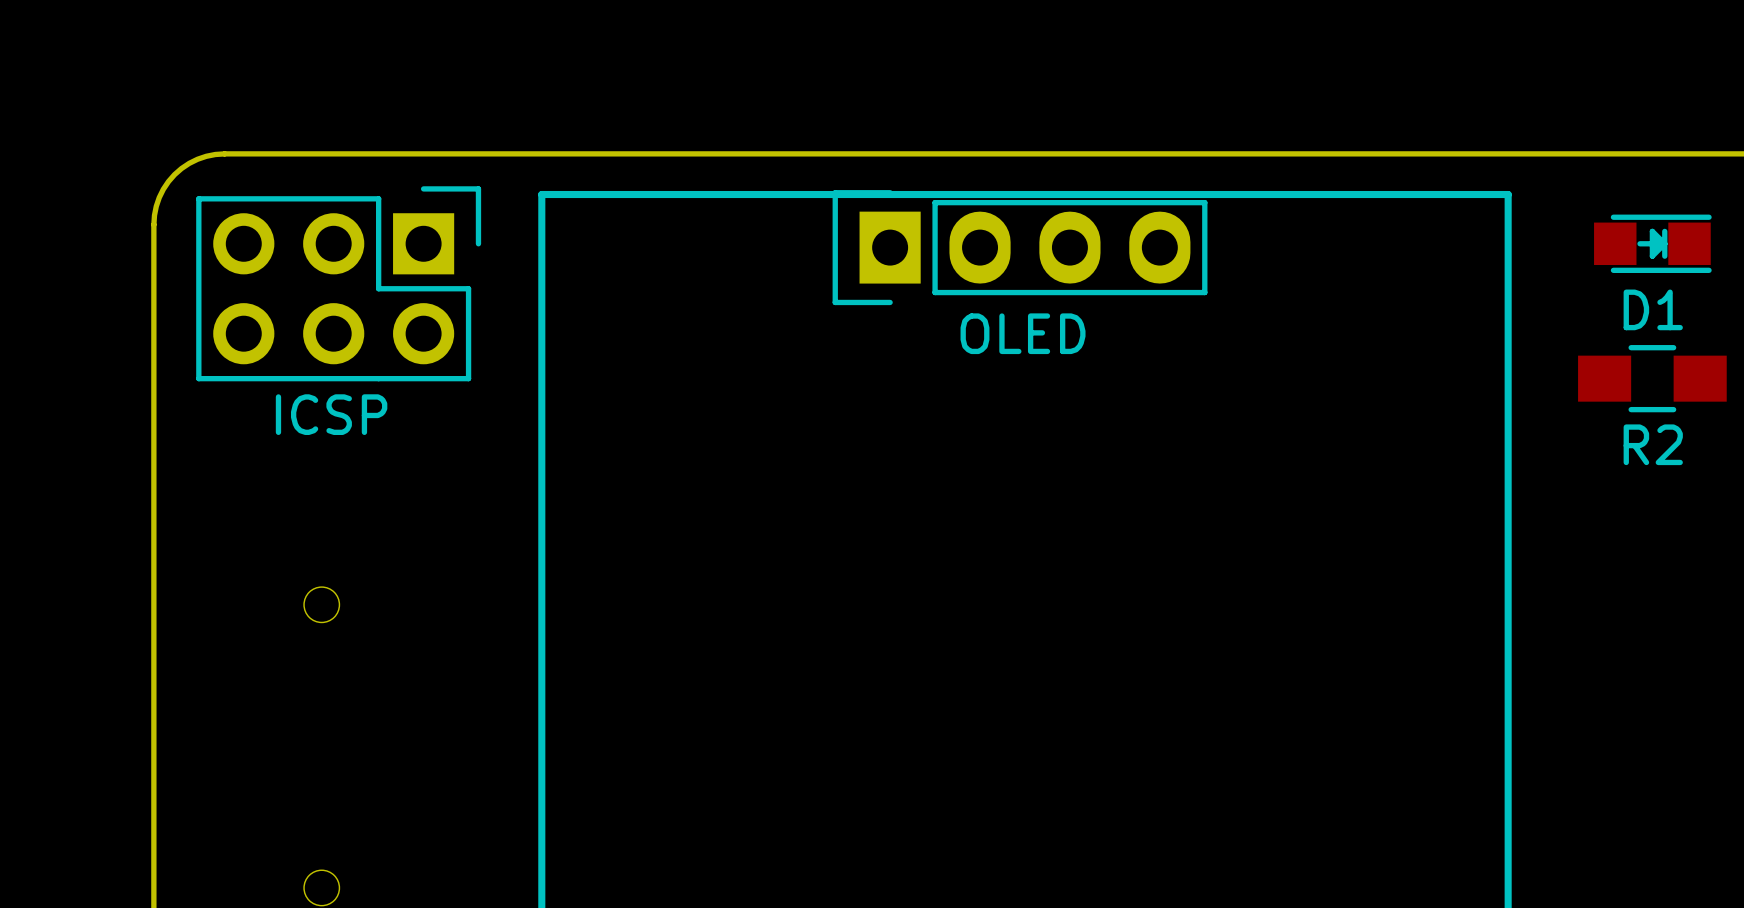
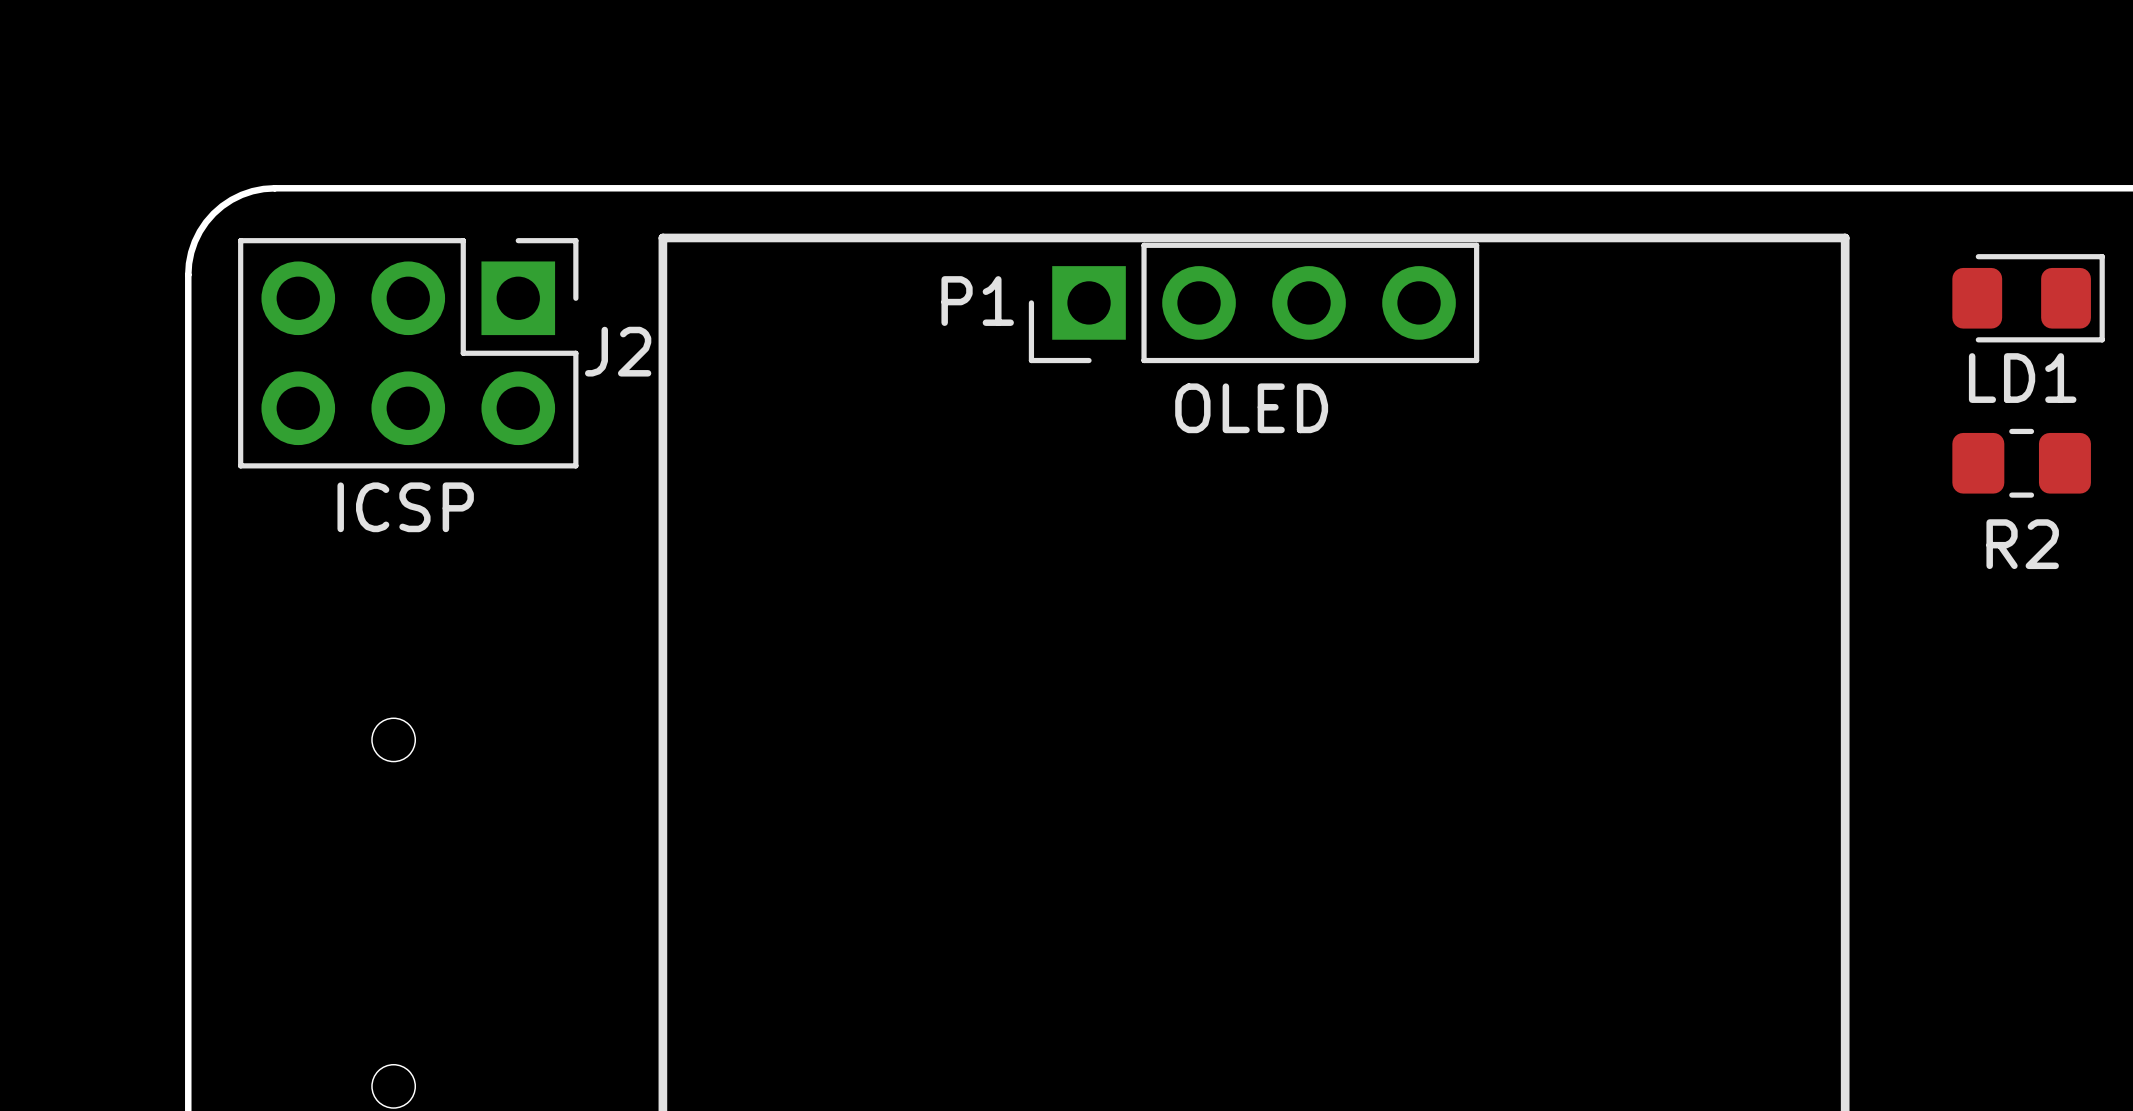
D1: (1652, 243) -> none
LD1: none -> (2028, 298)
part: (1020, 247) -> none
P1: none -> (1254, 302)
part: (338, 283) -> none
J2: none -> (408, 353)
R2 footprint: [1578, 345, 1727, 413] -> [1952, 428, 2091, 498]

